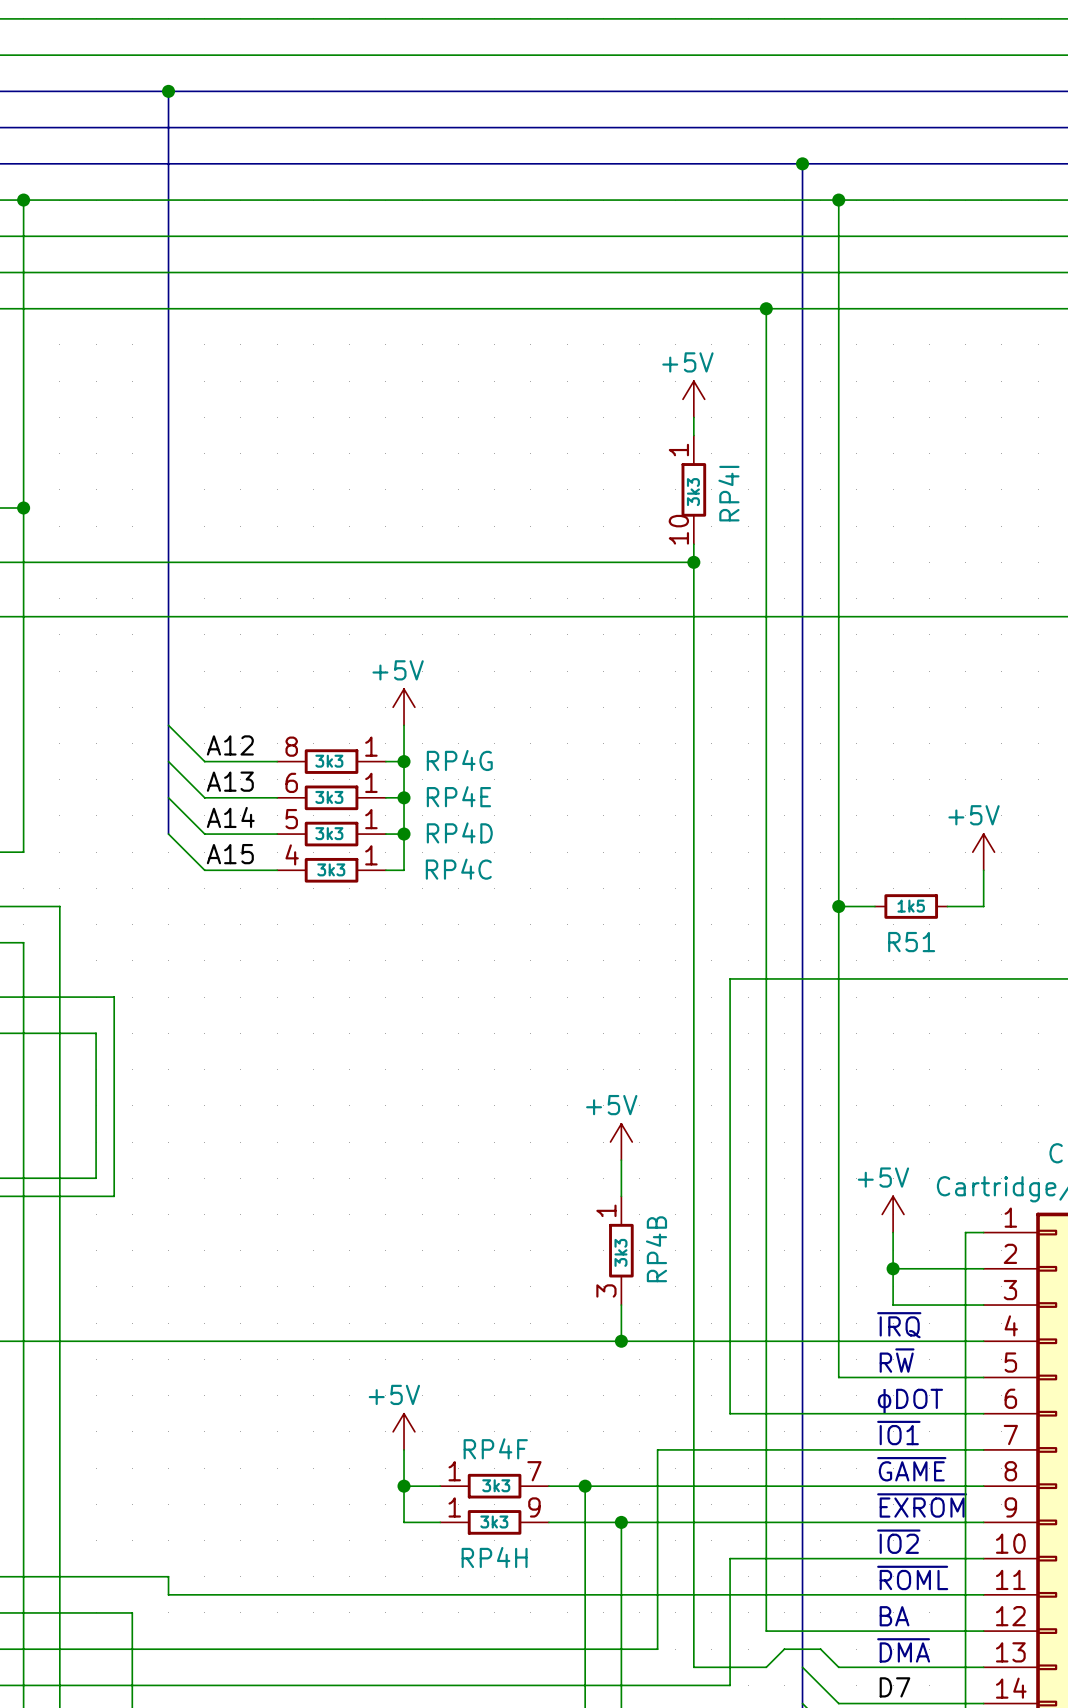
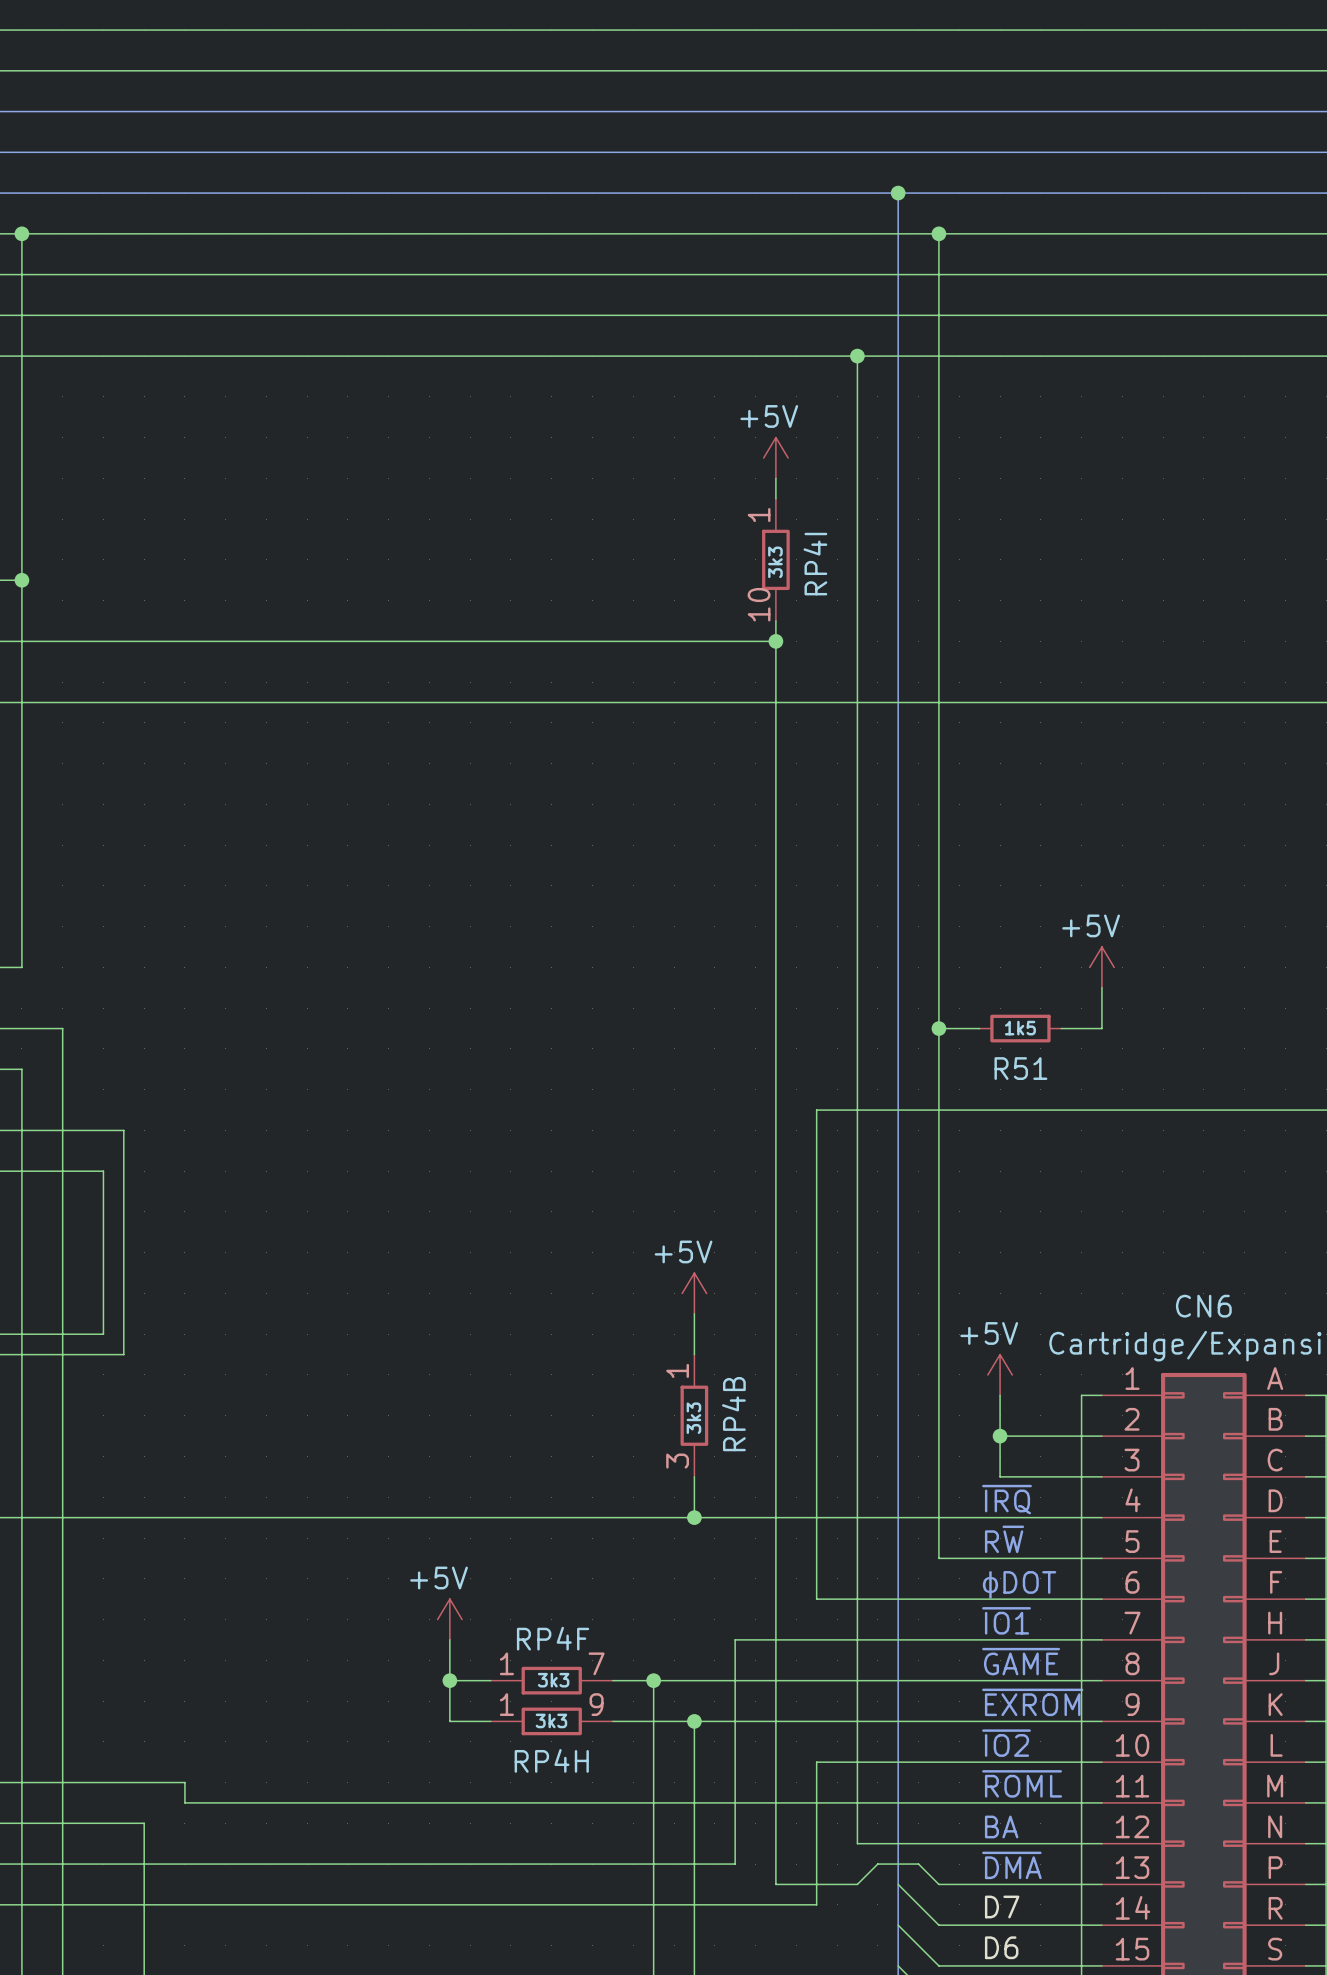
bus: (168, 91) (168, 834) -> none
junction: (168, 91) -> none
power symbol: +5V (404, 707) -> none
wire: (168, 725) (204, 761) (277, 761) -> none
wire: (404, 725) (404, 870) (385, 870) -> none
label: A12 (230, 745) -> none
wire: (168, 761) (204, 797) (277, 797) -> none
RP4G: 3k3 (331, 761) -> none
wire: (385, 761) (404, 761) -> none
junction: (404, 761) -> none
label: A13 (230, 781) -> none
wire: (168, 797) (204, 834) (277, 834) -> none
RP4E: 3k3 (331, 797) -> none
wire: (385, 797) (404, 797) -> none
junction: (404, 797) -> none
label: A14 (230, 817) -> none
wire: (168, 834) (204, 870) (277, 870) -> none
RP4D: 3k3 (331, 834) -> none
wire: (385, 834) (404, 834) -> none
junction: (404, 834) -> none
label: A15 (230, 854) -> none
RP4C: 3k3 (331, 870) -> none

